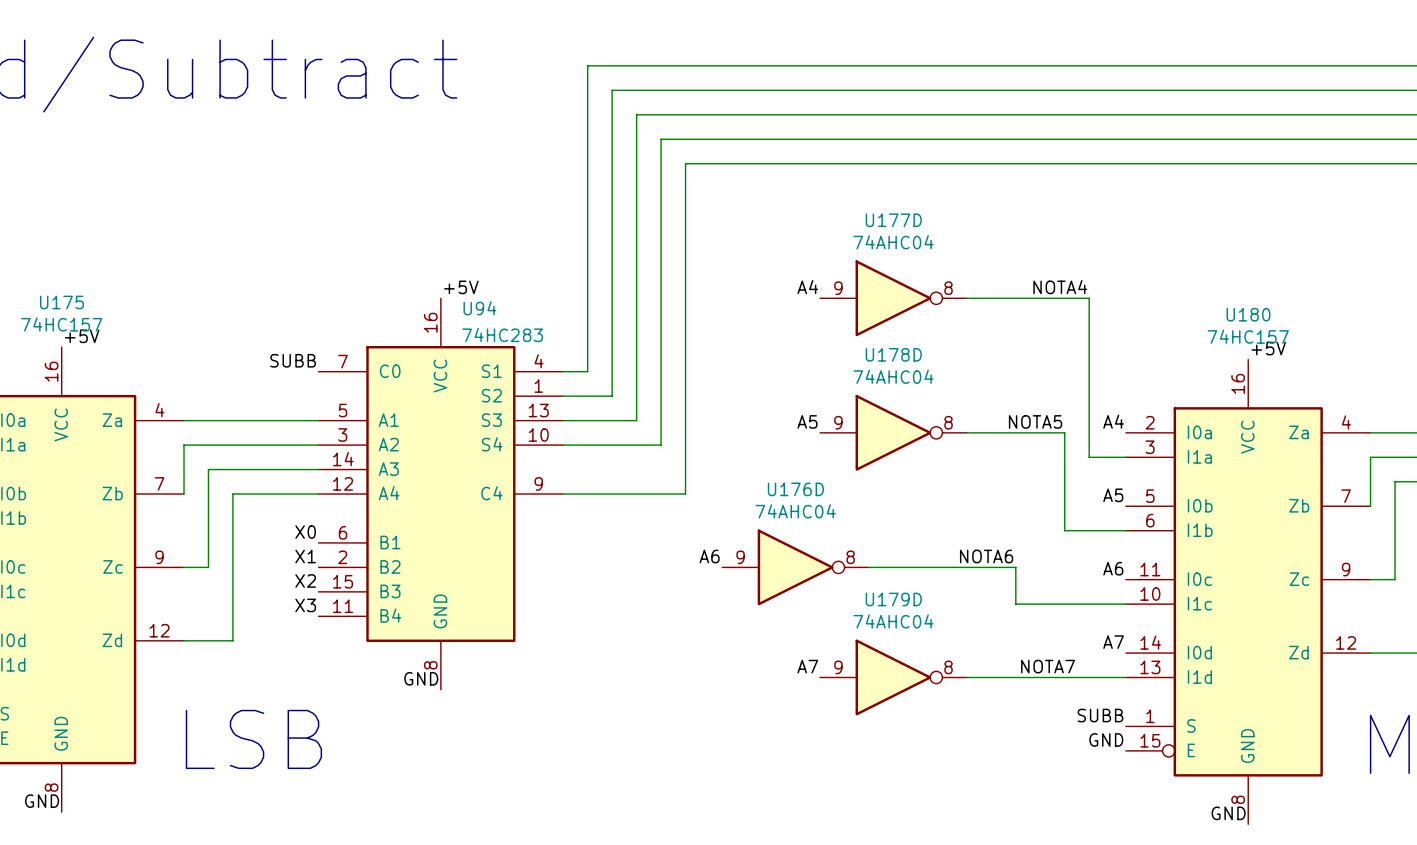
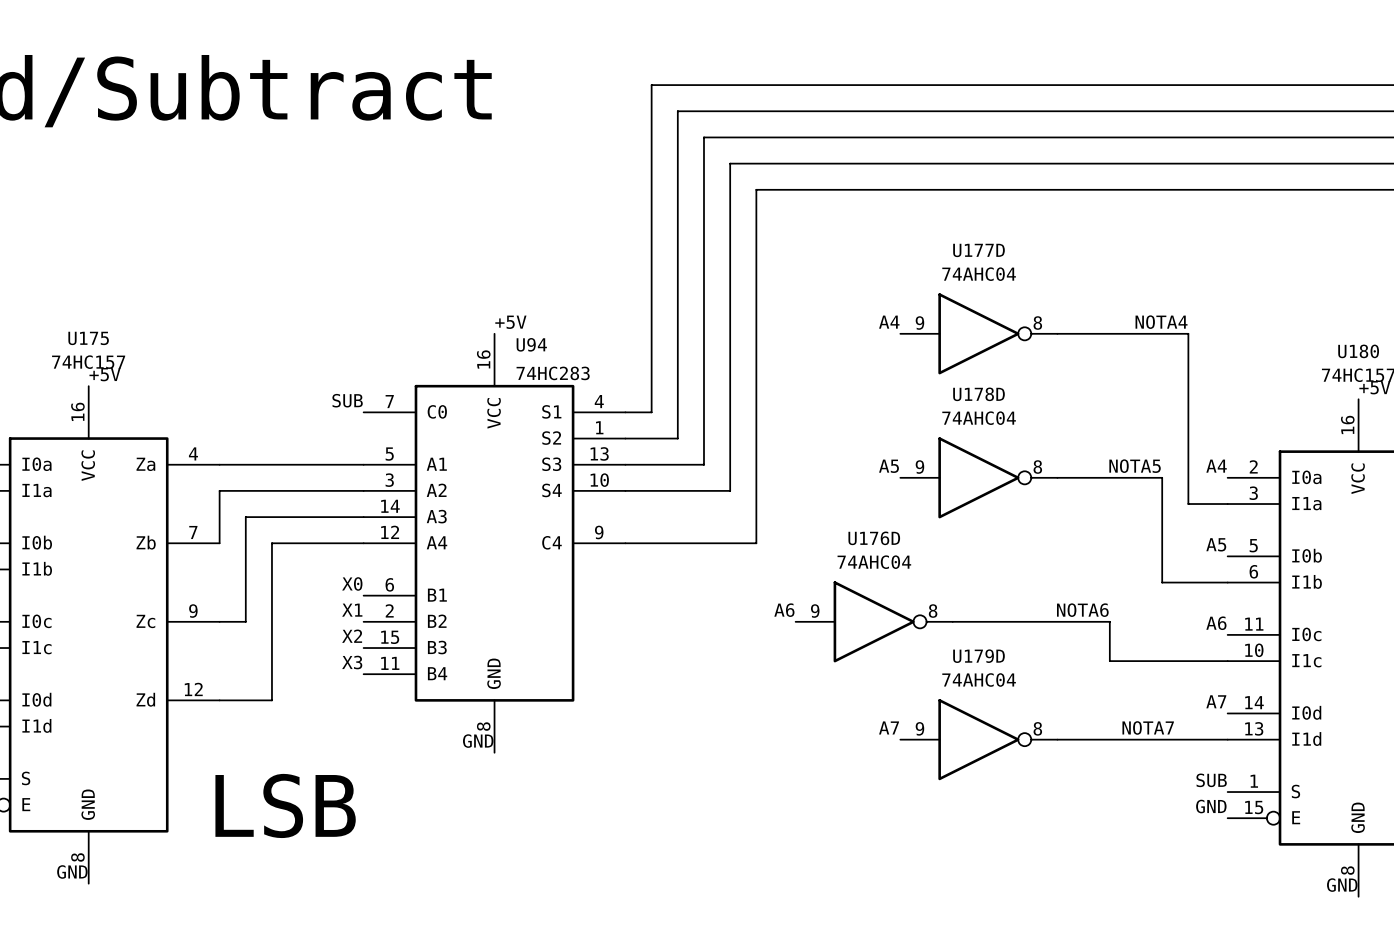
label: SUBB (293, 360) -> SUB (347, 400)
label: SUBB (1100, 715) -> SUB (1211, 780)

